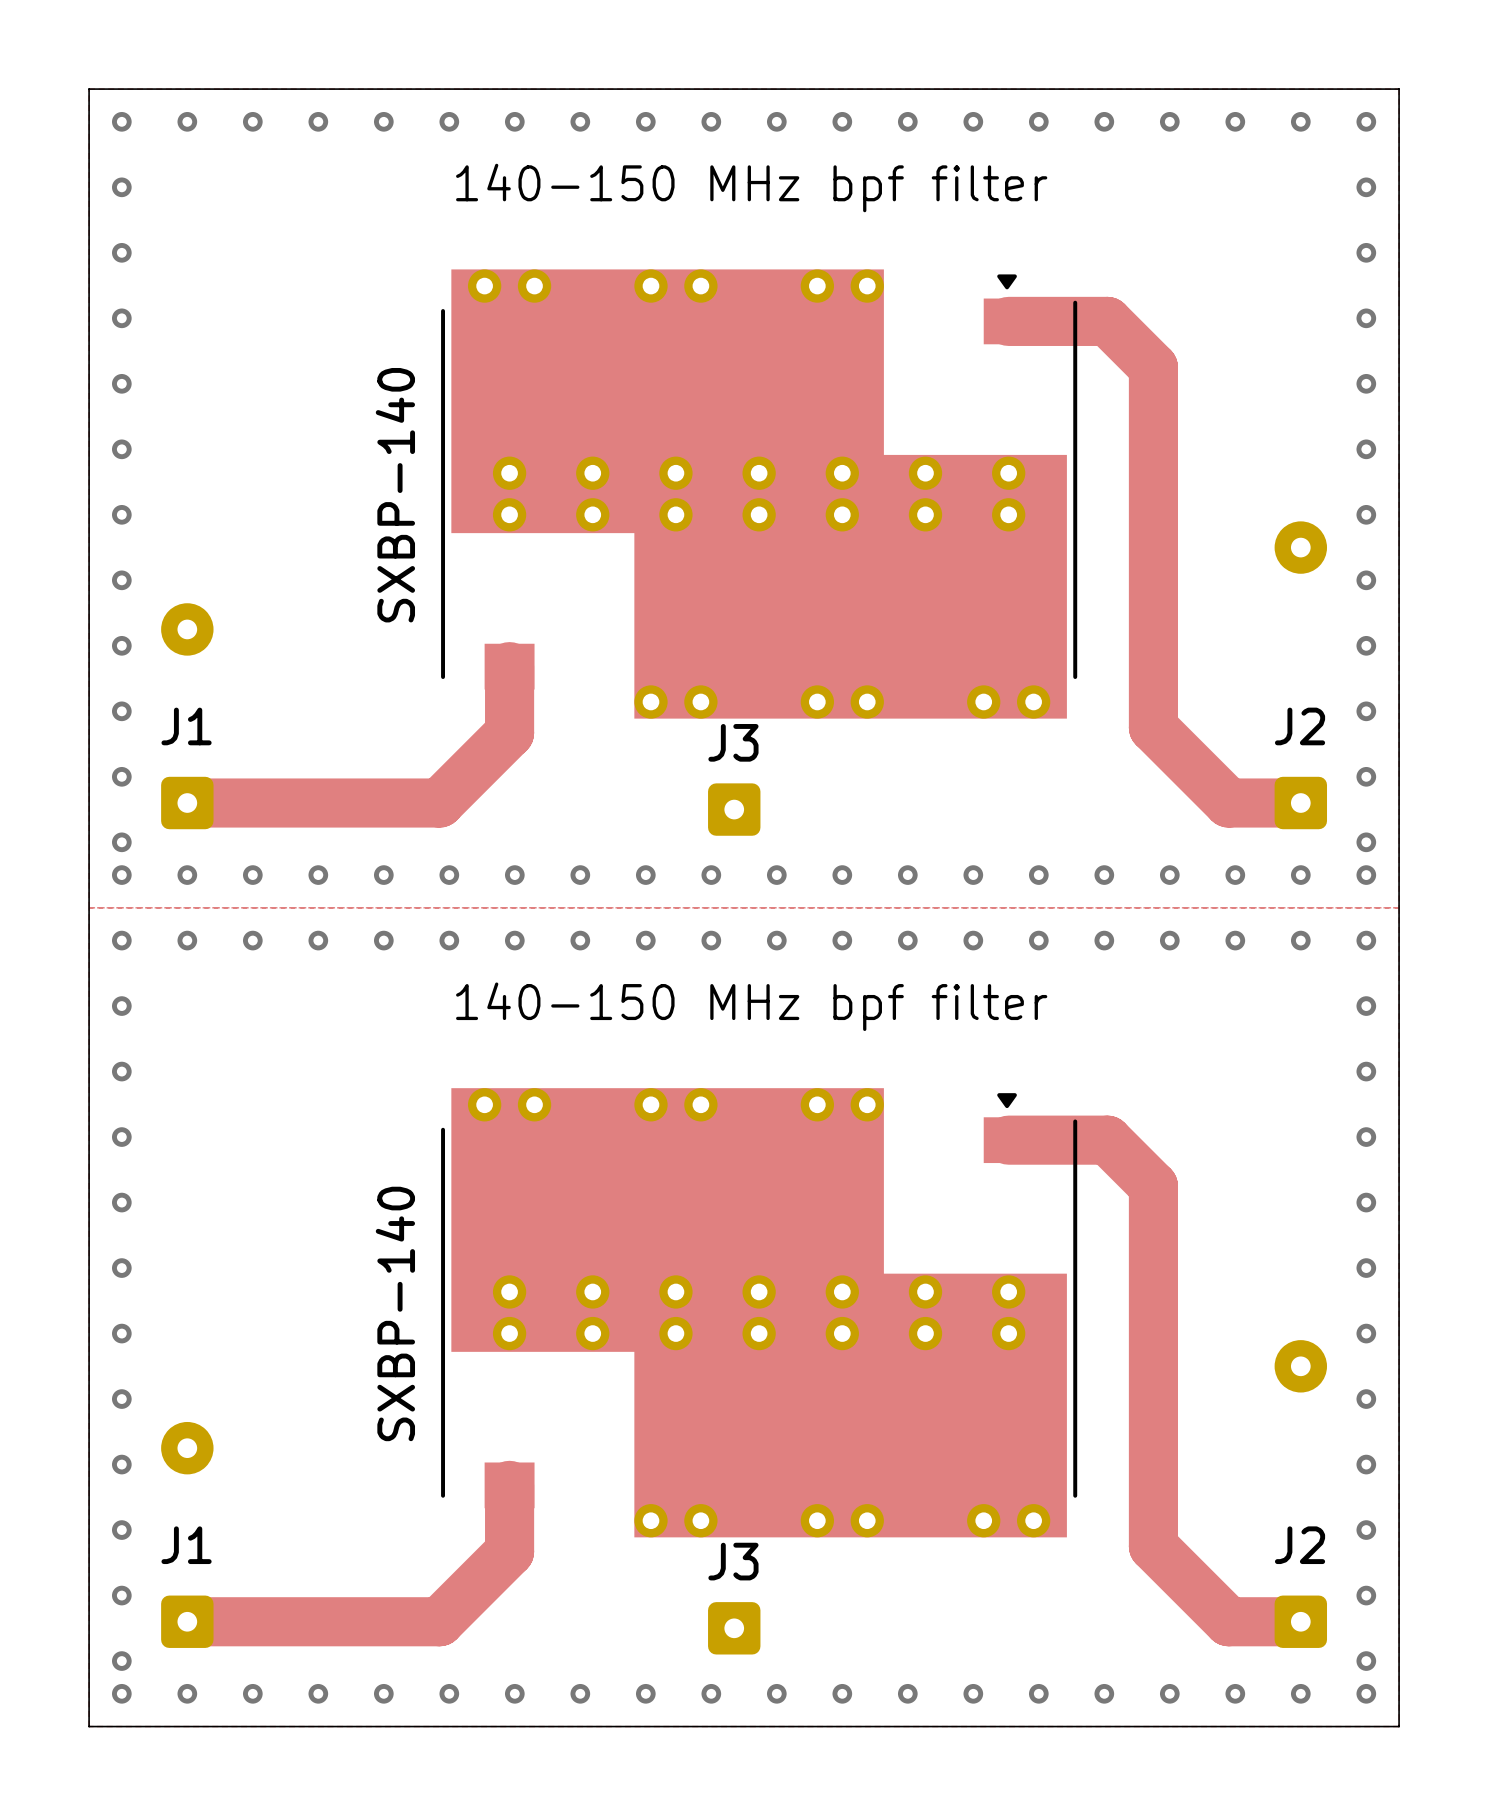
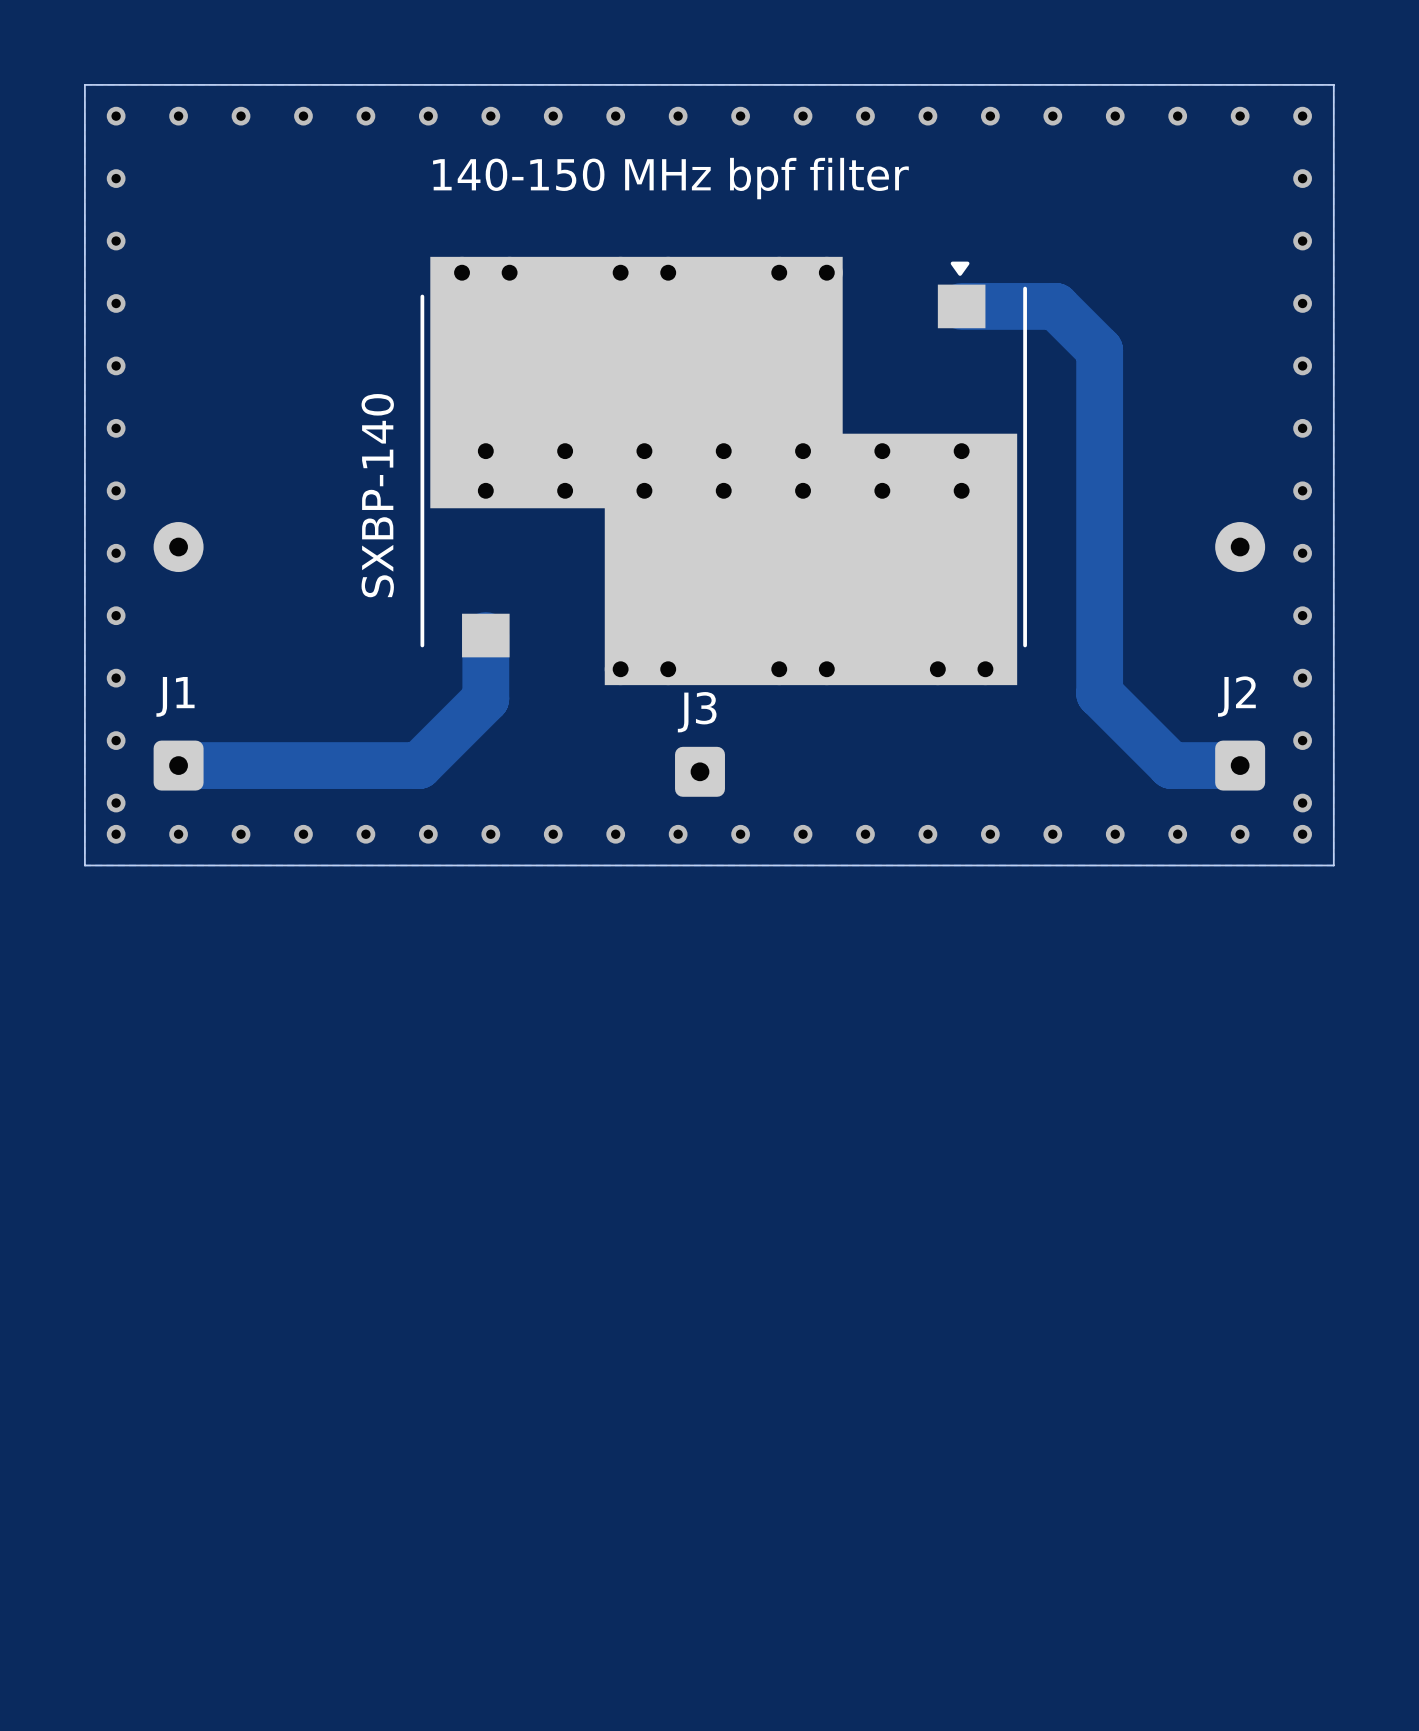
J2 footprint: [1274, 521, 1328, 830] -> [1215, 522, 1266, 791]
J1 footprint: [161, 603, 214, 830] -> [153, 522, 204, 791]
board edge: (89, 907) (89, 1726) (1399, 1726) (1399, 907) -> (84, 865) (1333, 865)
via: (121, 940) -> none
via: (187, 940) -> none
via: (252, 940) -> none
via: (318, 940) -> none
via: (383, 940) -> none
via: (449, 940) -> none
via: (514, 940) -> none
via: (580, 940) -> none
via: (645, 940) -> none
via: (711, 940) -> none
via: (776, 940) -> none
via: (842, 940) -> none
via: (907, 940) -> none
via: (973, 940) -> none
via: (1038, 940) -> none
via: (1104, 940) -> none
via: (1169, 940) -> none
via: (1235, 940) -> none
via: (1300, 940) -> none
via: (1366, 940) -> none
via: (121, 1006) -> none
text: 140-150 MHz bpf filter (751, 1006) -> none
via: (1366, 1006) -> none
via: (121, 1071) -> none
via: (1366, 1071) -> none
via: (121, 1137) -> none
via: (1366, 1137) -> none
track: (1008, 1140) (1107, 1140) (1153, 1186) (1153, 1546) (1228, 1621) (1300, 1621) -> none
via: (121, 1202) -> none
via: (1366, 1202) -> none
via: (121, 1268) -> none
via: (1366, 1268) -> none
part: (759, 1312) -> none
text: SXBP-140 (395, 1313) -> none
via: (121, 1333) -> none
via: (1366, 1333) -> none
via: (121, 1399) -> none
via: (1366, 1399) -> none
via: (121, 1464) -> none
via: (1366, 1464) -> none
track: (509, 1485) (509, 1551) (439, 1621) (187, 1621) -> none
J2: (1300, 1494) -> none
via: (121, 1530) -> none
via: (1366, 1530) -> none
J1: (187, 1534) -> none
via: (121, 1595) -> none
via: (1366, 1595) -> none
J3: (734, 1628) -> none
via: (121, 1661) -> none
via: (1366, 1661) -> none
via: (121, 1693) -> none
via: (187, 1693) -> none
via: (252, 1693) -> none
via: (318, 1693) -> none
via: (383, 1693) -> none
via: (449, 1693) -> none
via: (514, 1693) -> none
via: (580, 1693) -> none
via: (645, 1693) -> none
via: (711, 1693) -> none
via: (776, 1693) -> none
via: (842, 1693) -> none
via: (907, 1693) -> none
via: (973, 1693) -> none
via: (1038, 1693) -> none
via: (1104, 1693) -> none
via: (1169, 1693) -> none
via: (1235, 1693) -> none
via: (1300, 1693) -> none
via: (1366, 1693) -> none

